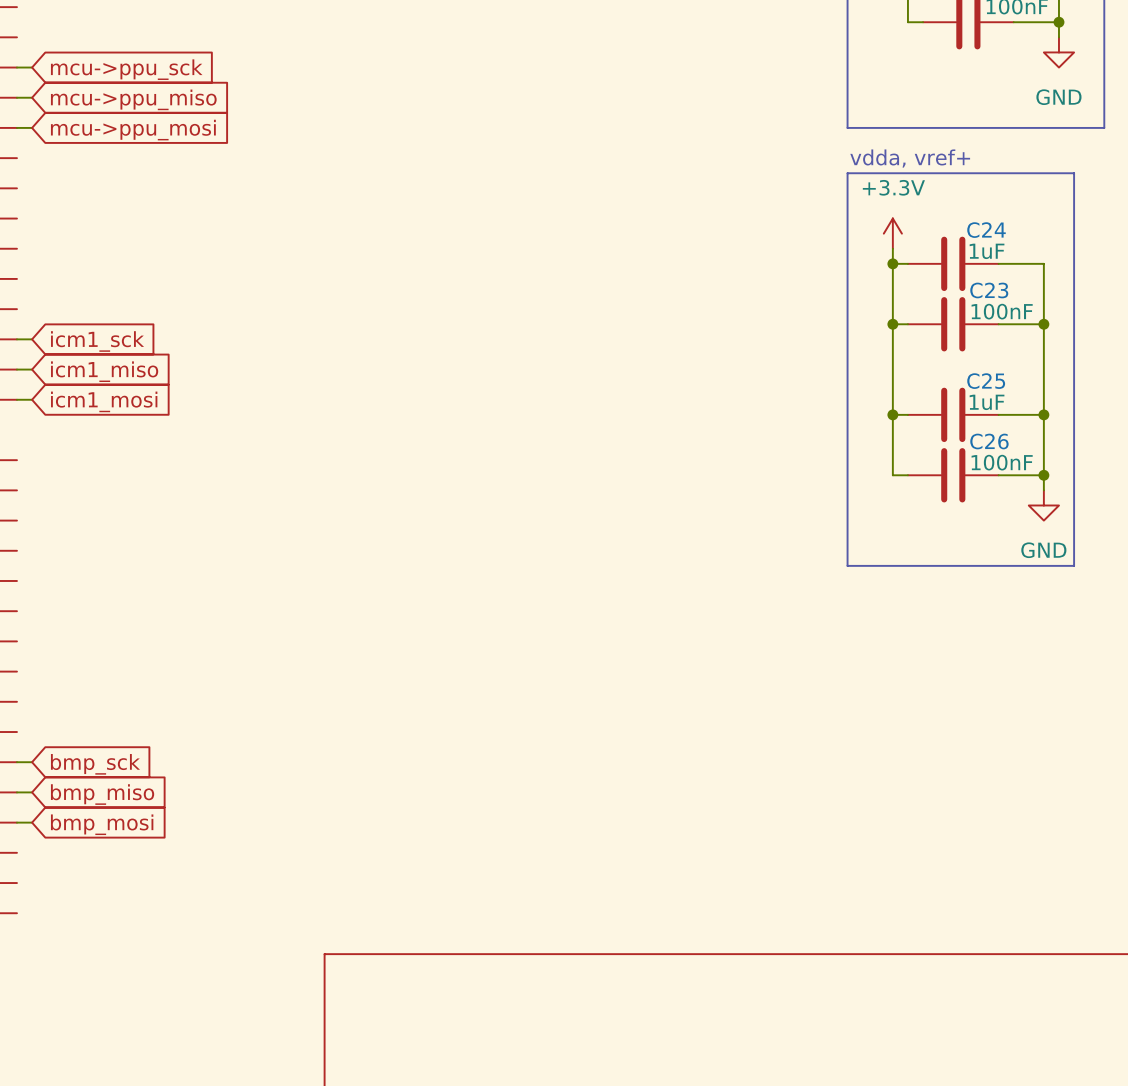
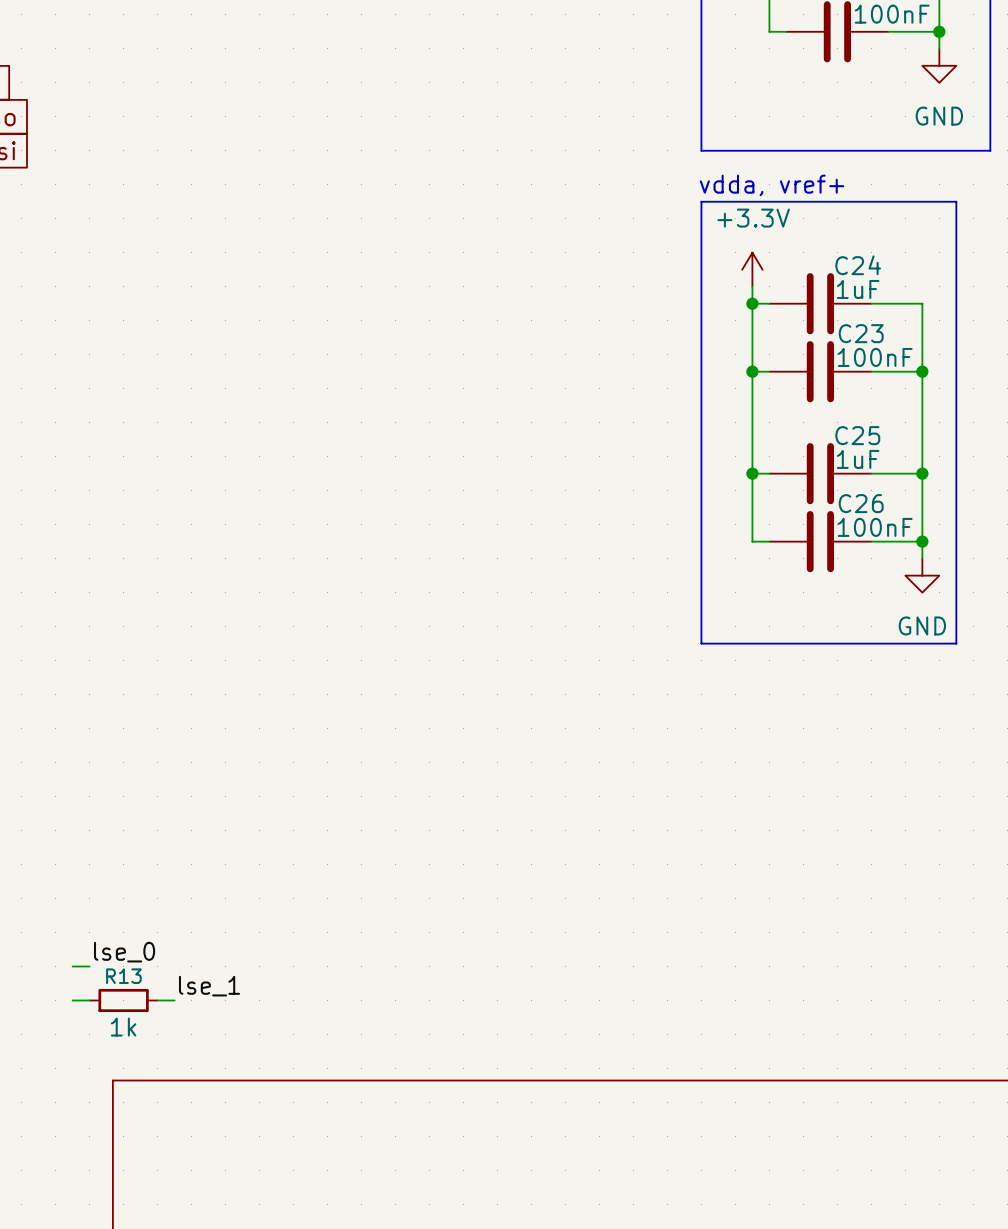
label: none -> lse_0 (124, 952)
wire: none -> (72, 966) (89, 966)
label: none -> lse_1 (209, 986)
wire: none -> (72, 1000) (89, 1000)
R13: none -> 1k (123, 1000)
wire: none -> (157, 1000) (174, 1000)

